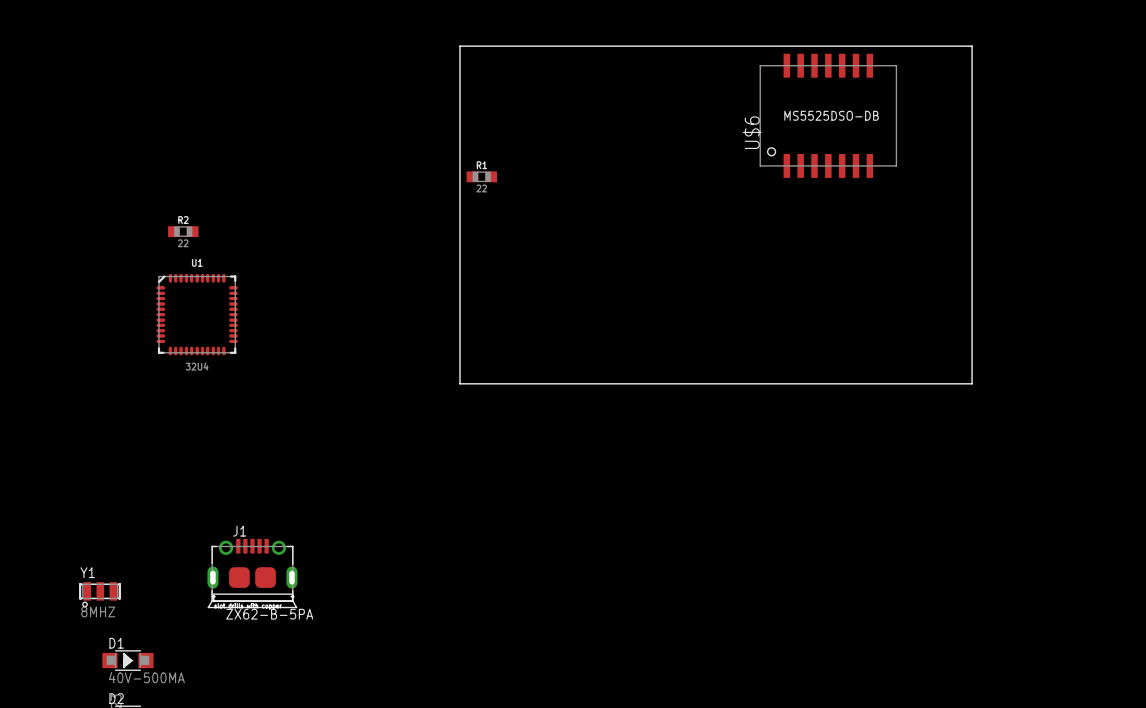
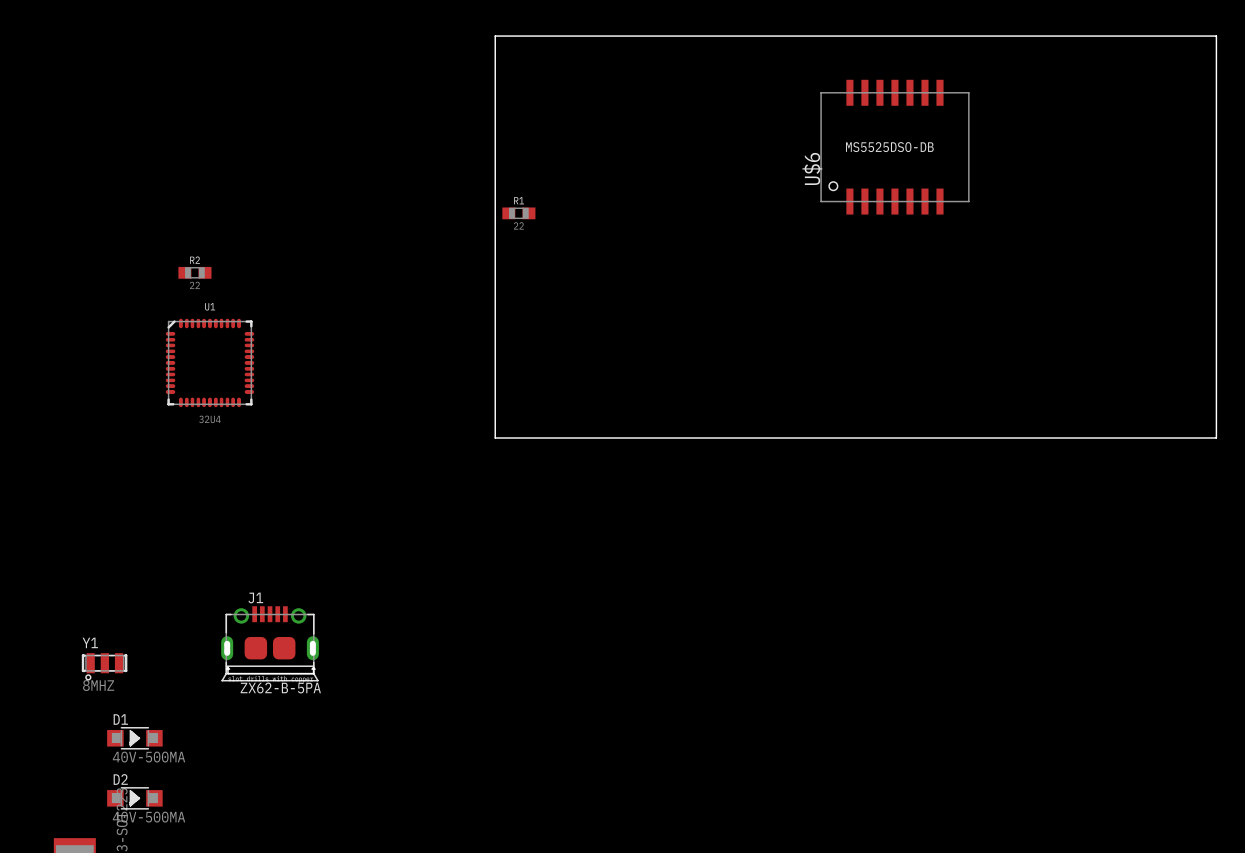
board edge: (460, 46) (972, 46) (972, 383) -> (495, 71) (495, 36) (1216, 36) (1216, 438) (1050, 438)

